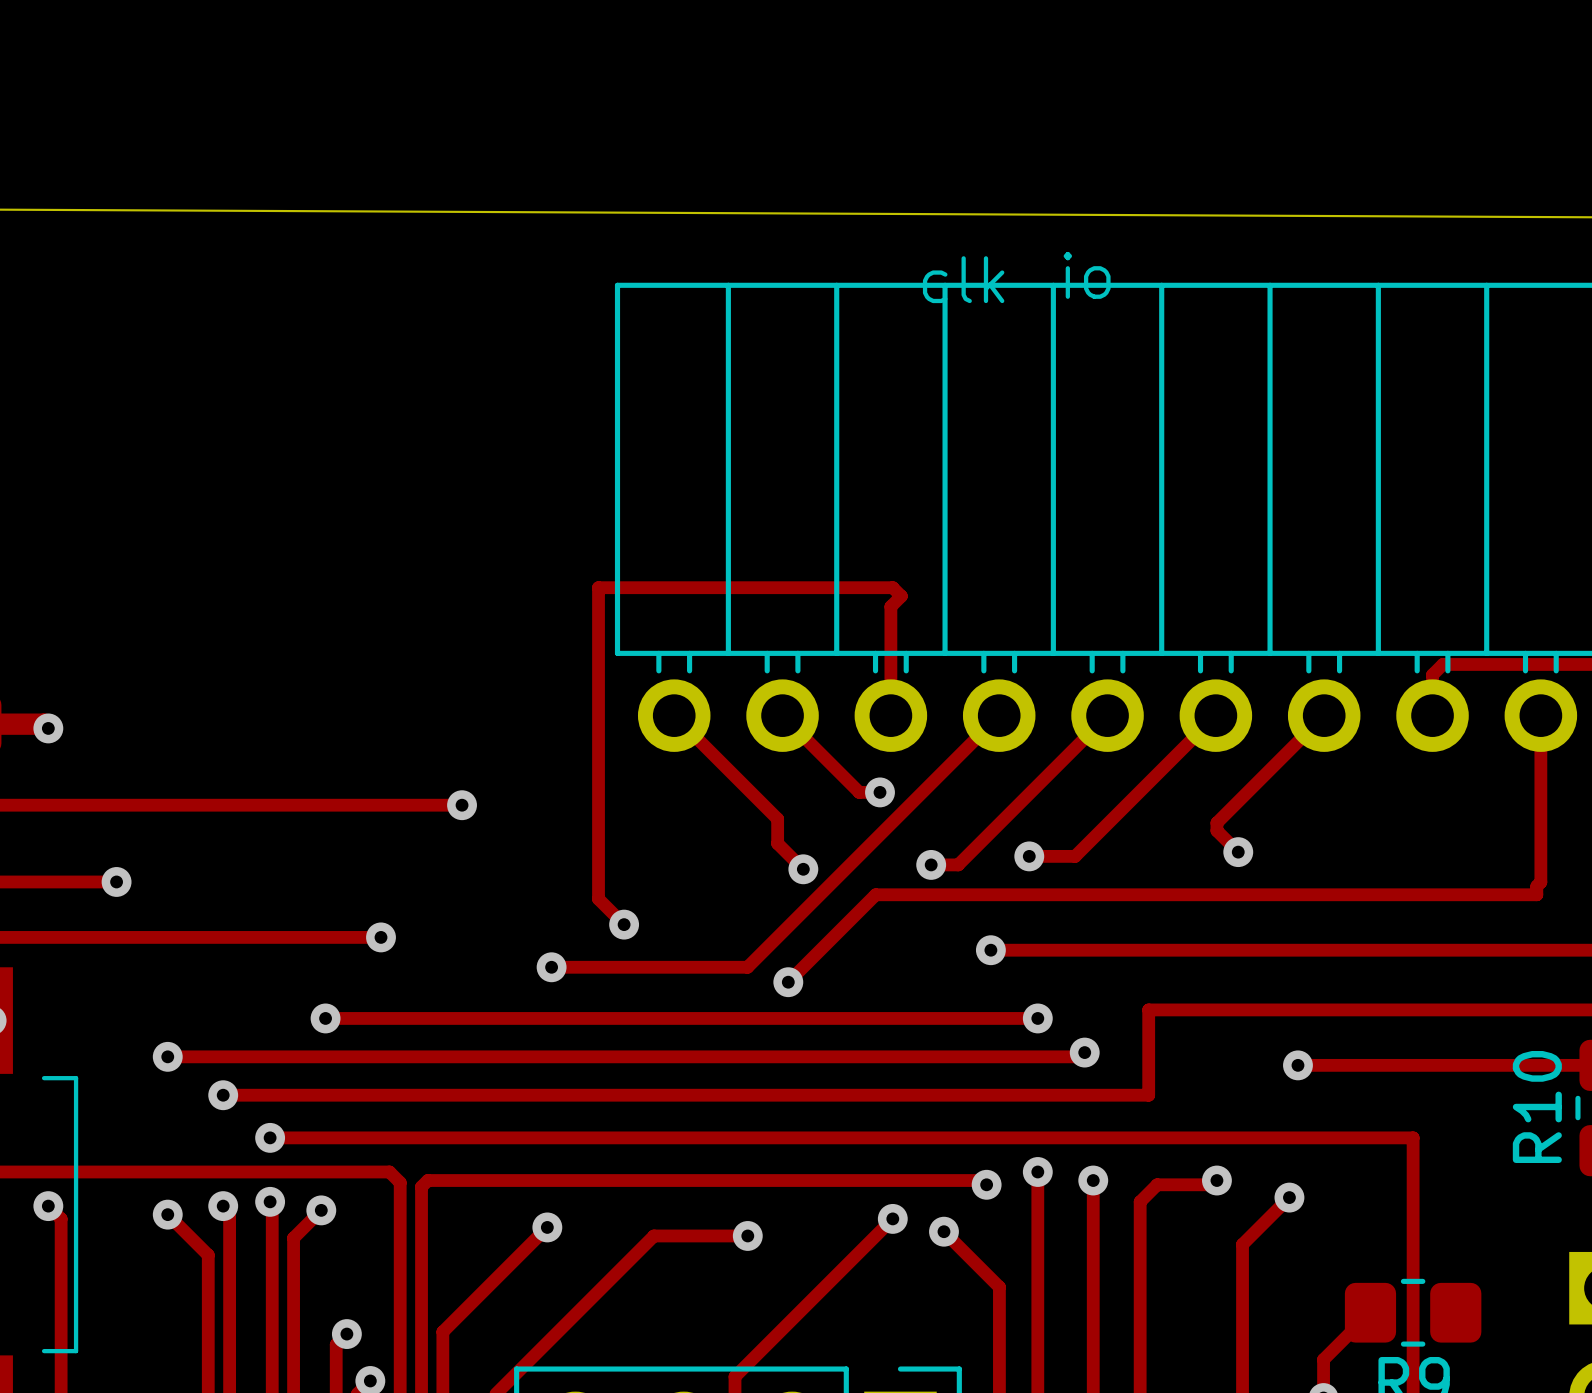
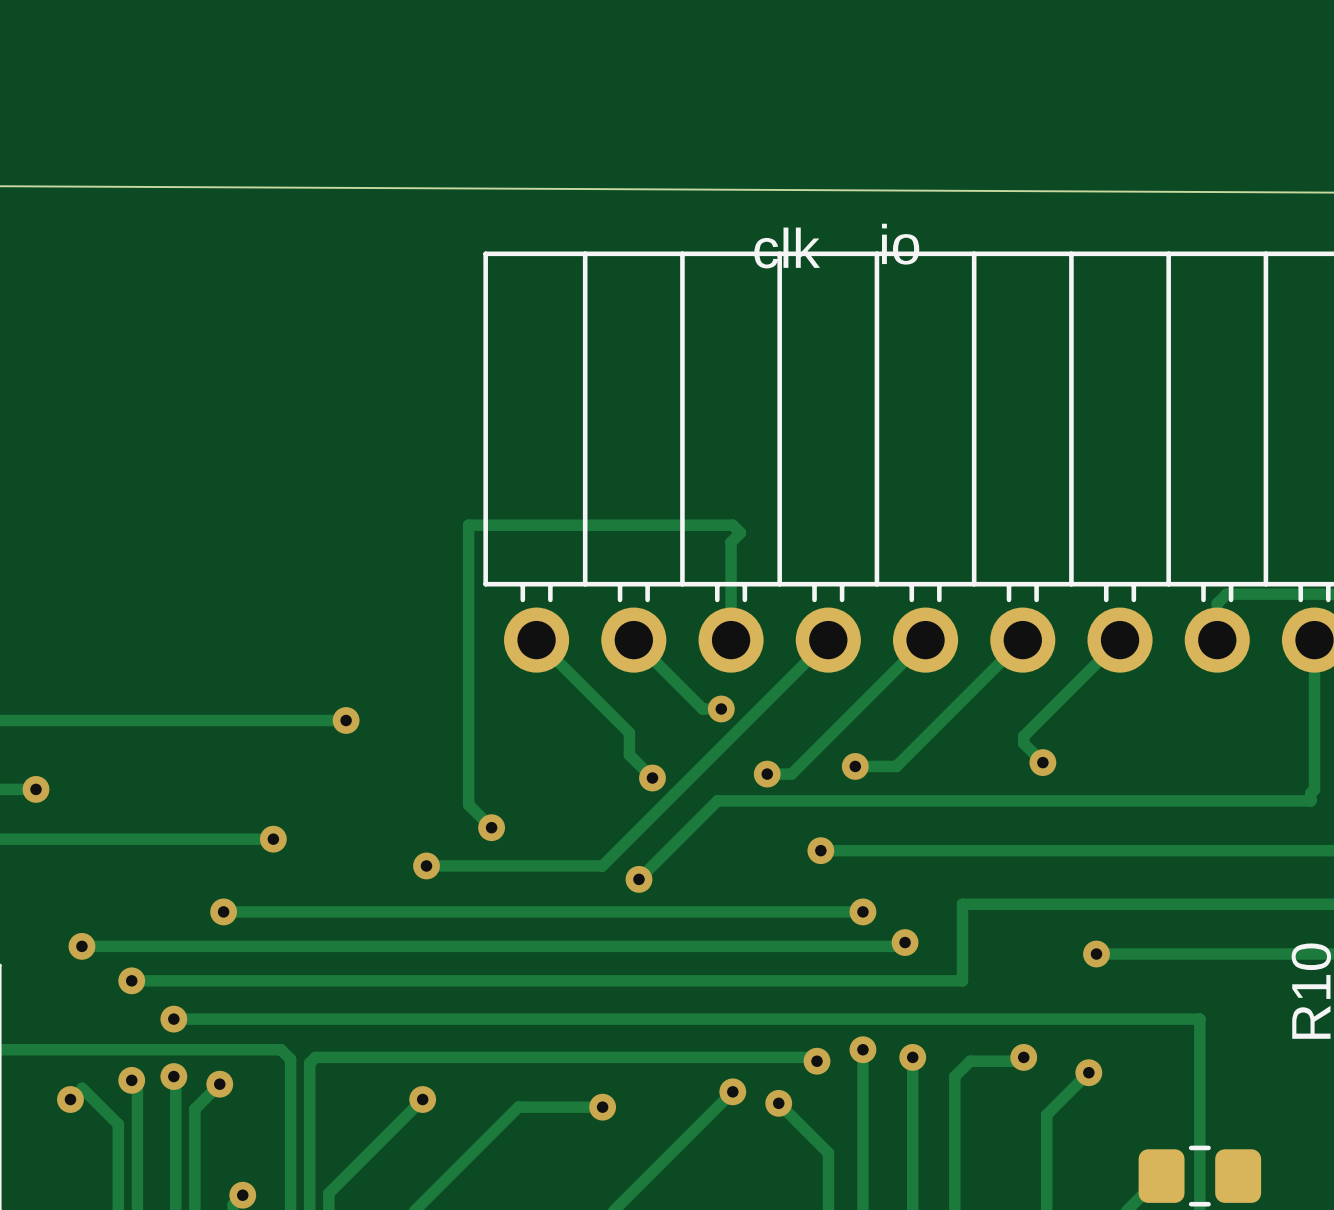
via position: (167, 1214) -> (70, 1099)

